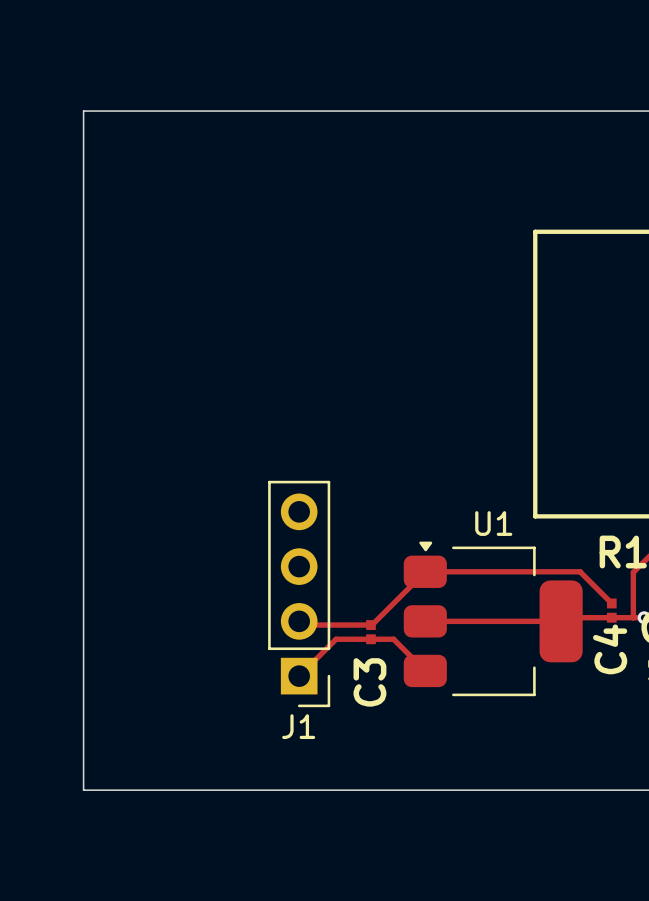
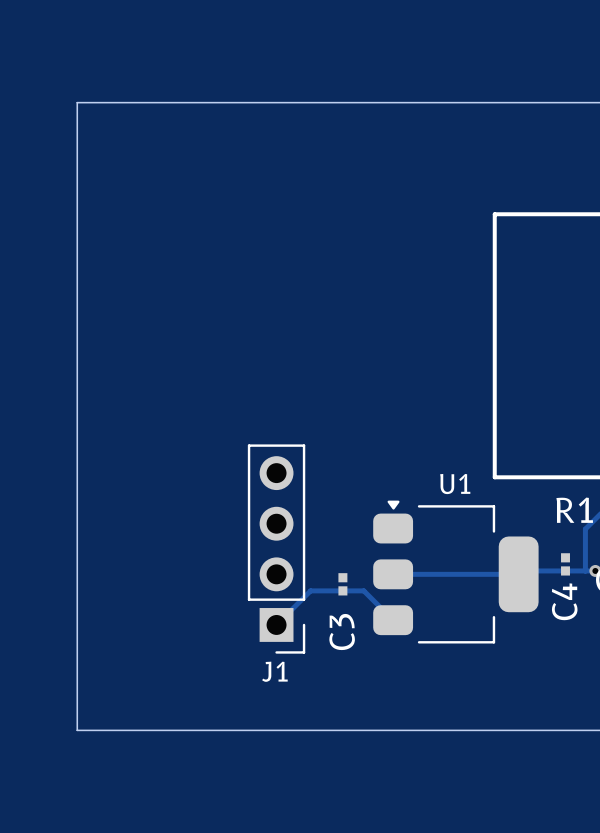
track: (611, 603) (580, 571) (425, 571) (372, 625) -> none
track: (302, 625) (370, 625) -> none

